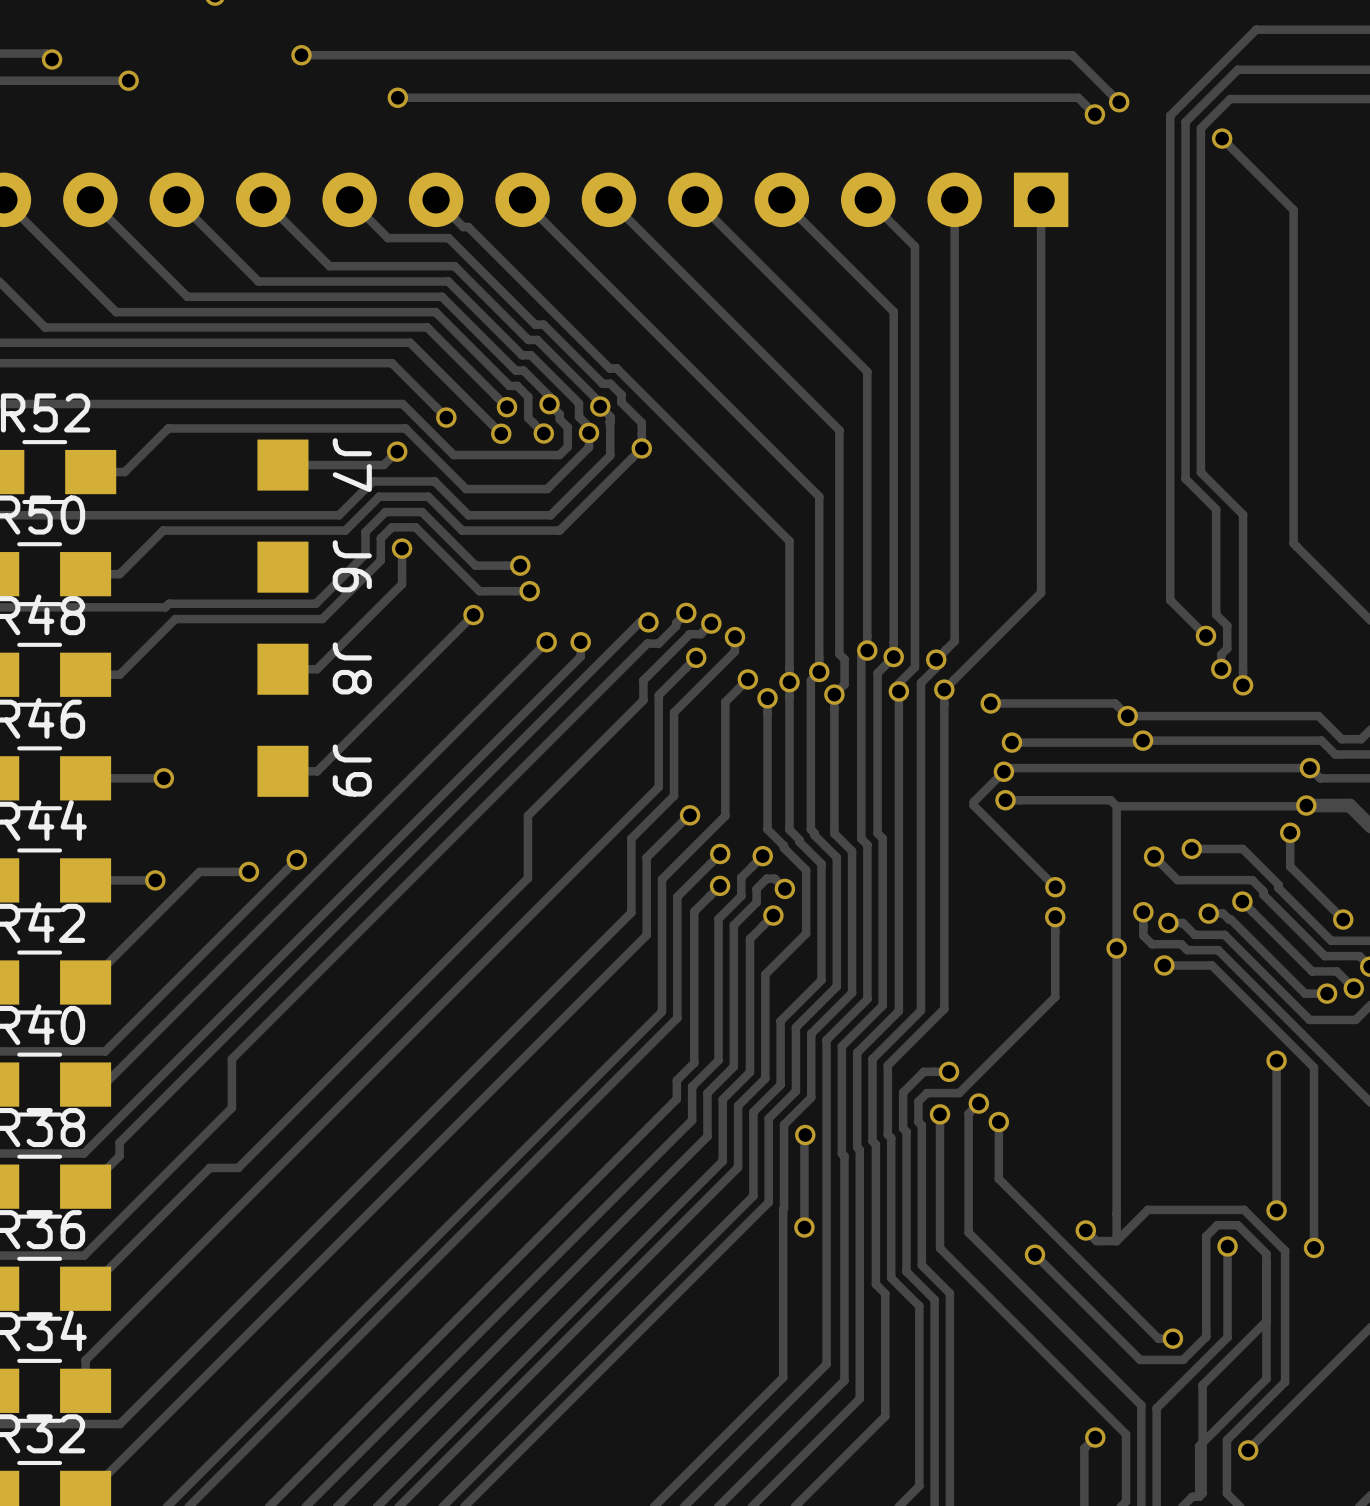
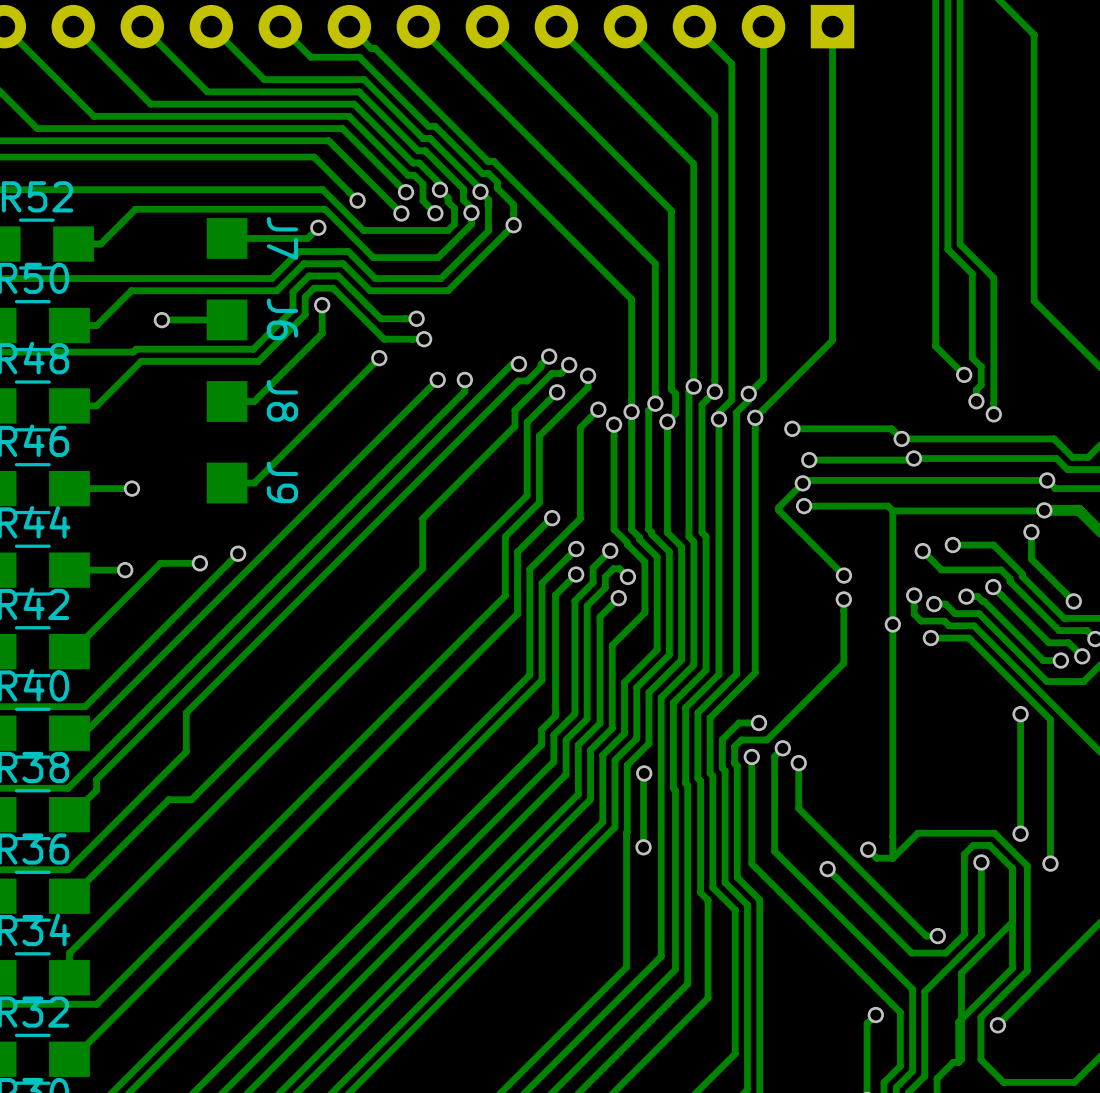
via: none -> (161, 320)
track: none -> (227, 319) (162, 319)

